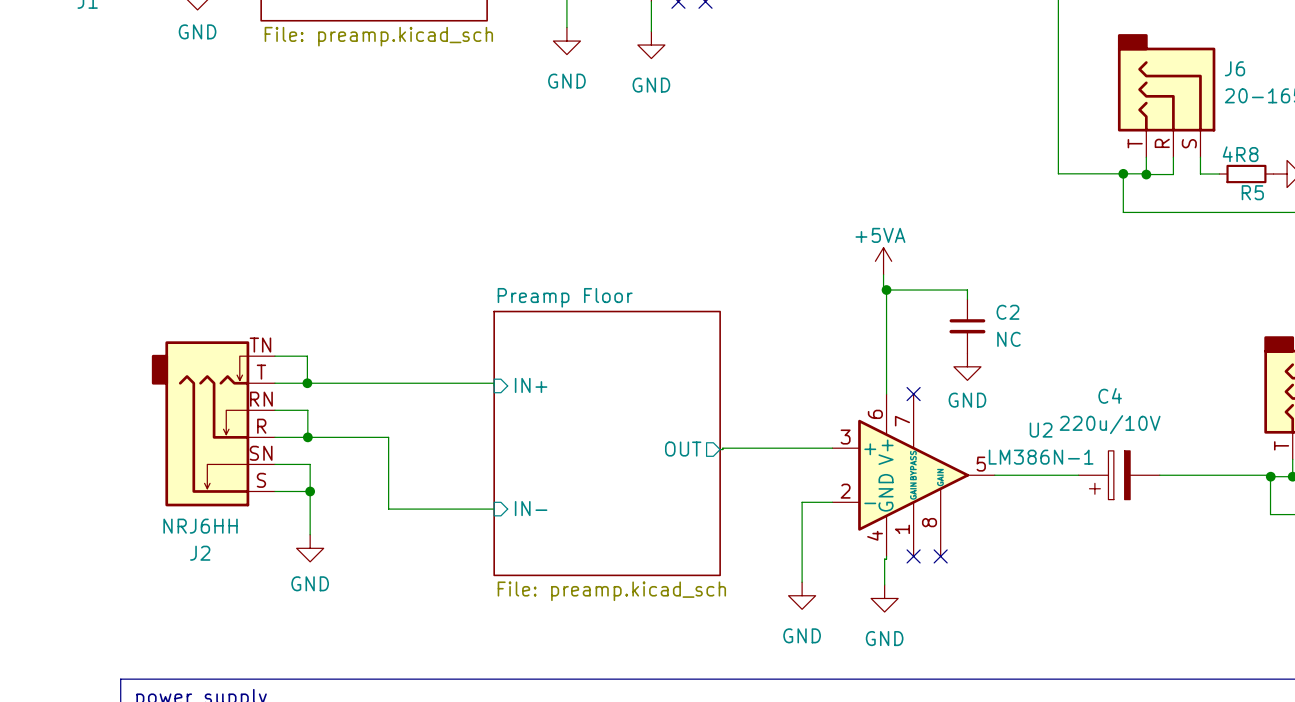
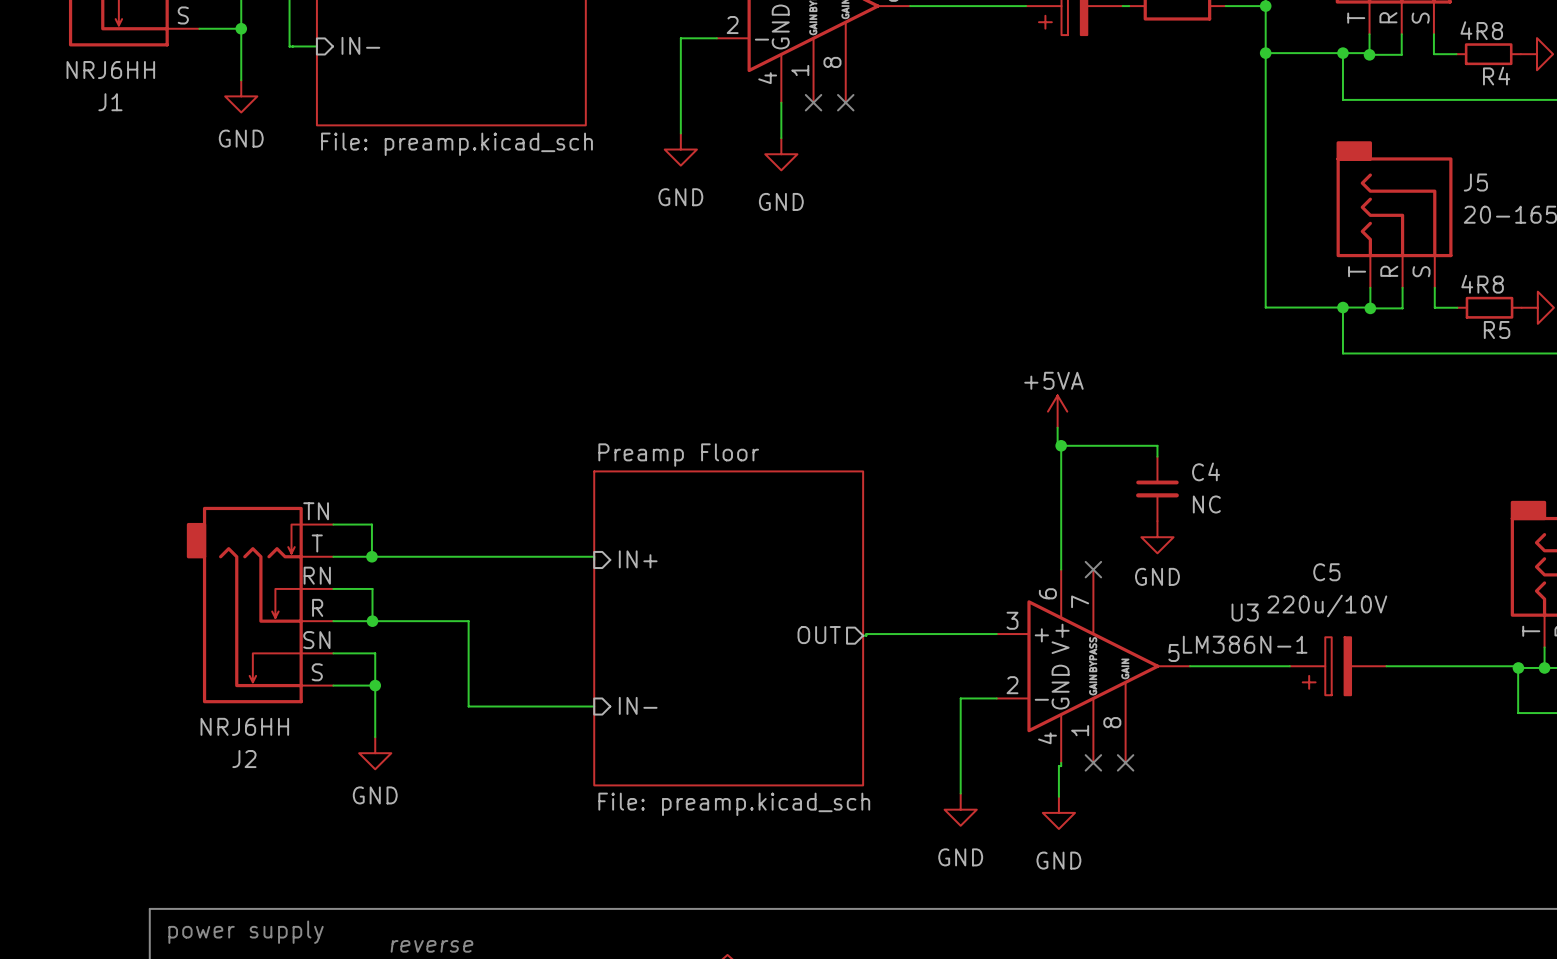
J6 name: J6 (1234, 68) -> J5 (1475, 182)
C2 name: C2 (1007, 312) -> C4 (1206, 471)
C4 name: C4 (1110, 395) -> C5 (1326, 572)
U2 name: U2 (1041, 430) -> U3 (1245, 612)

